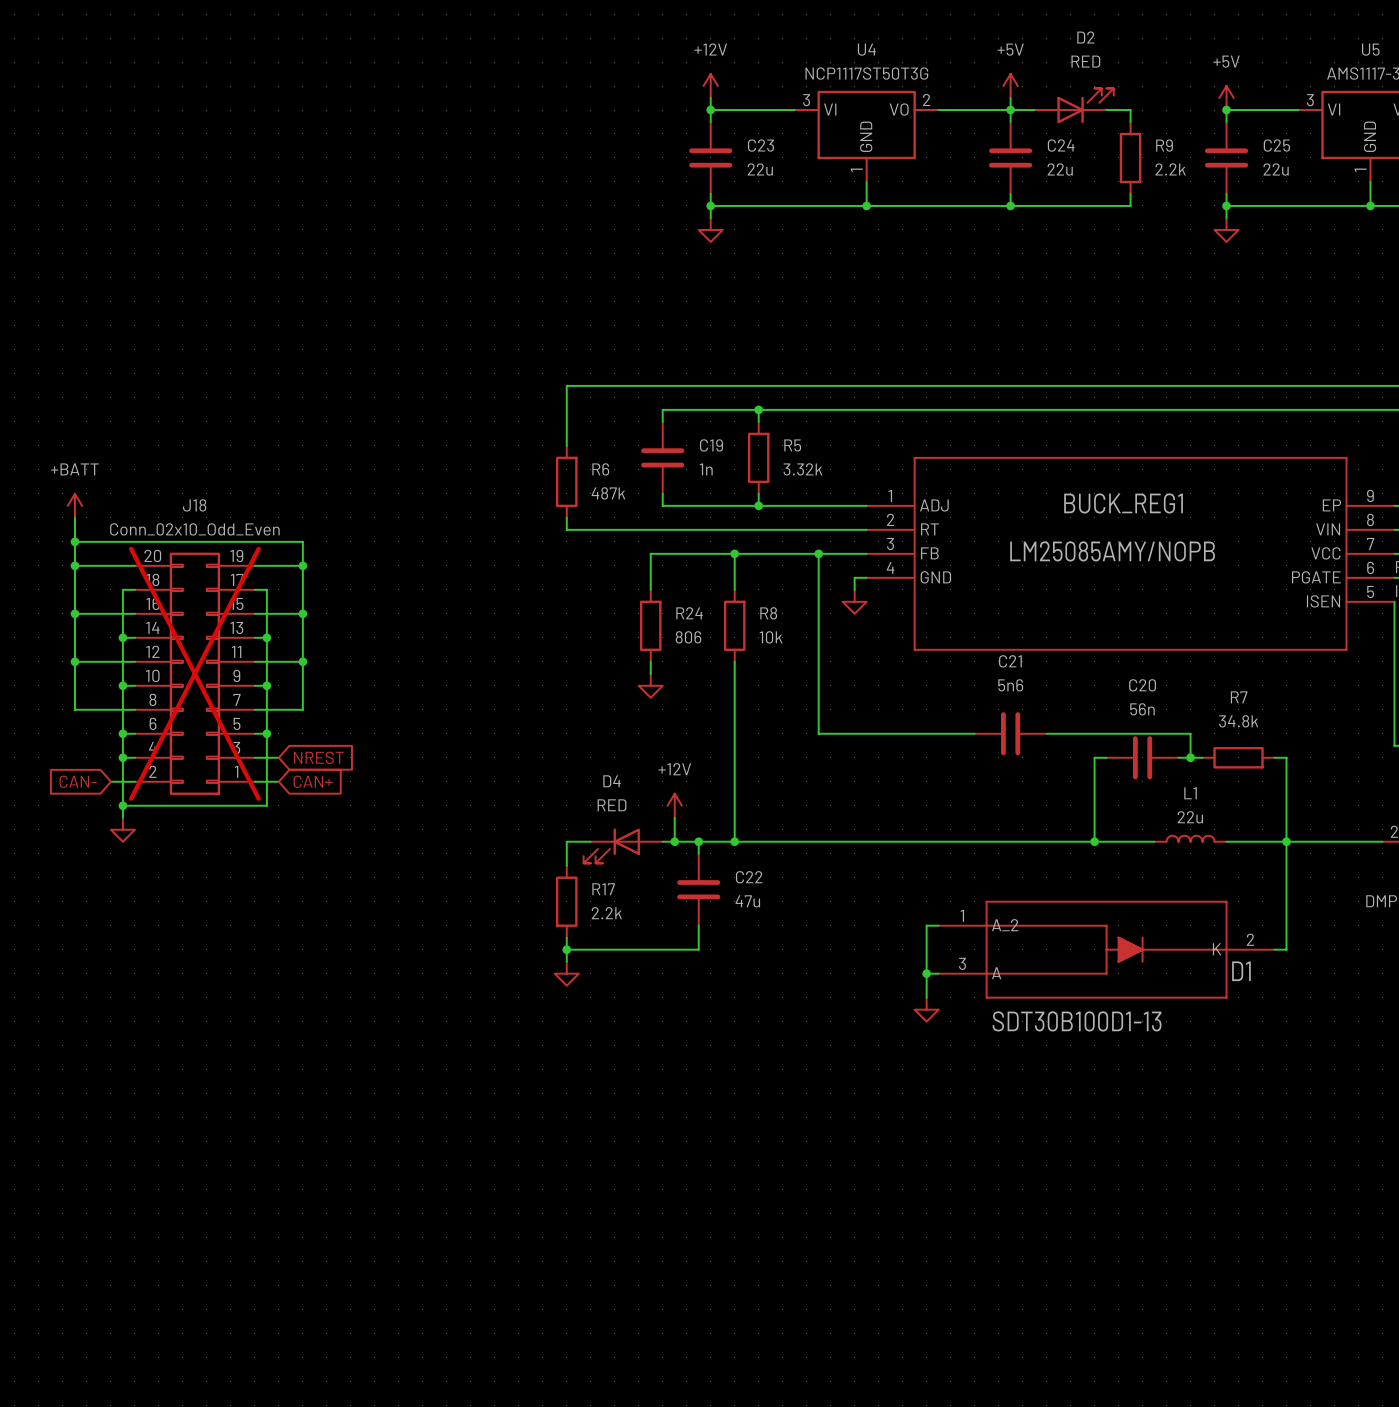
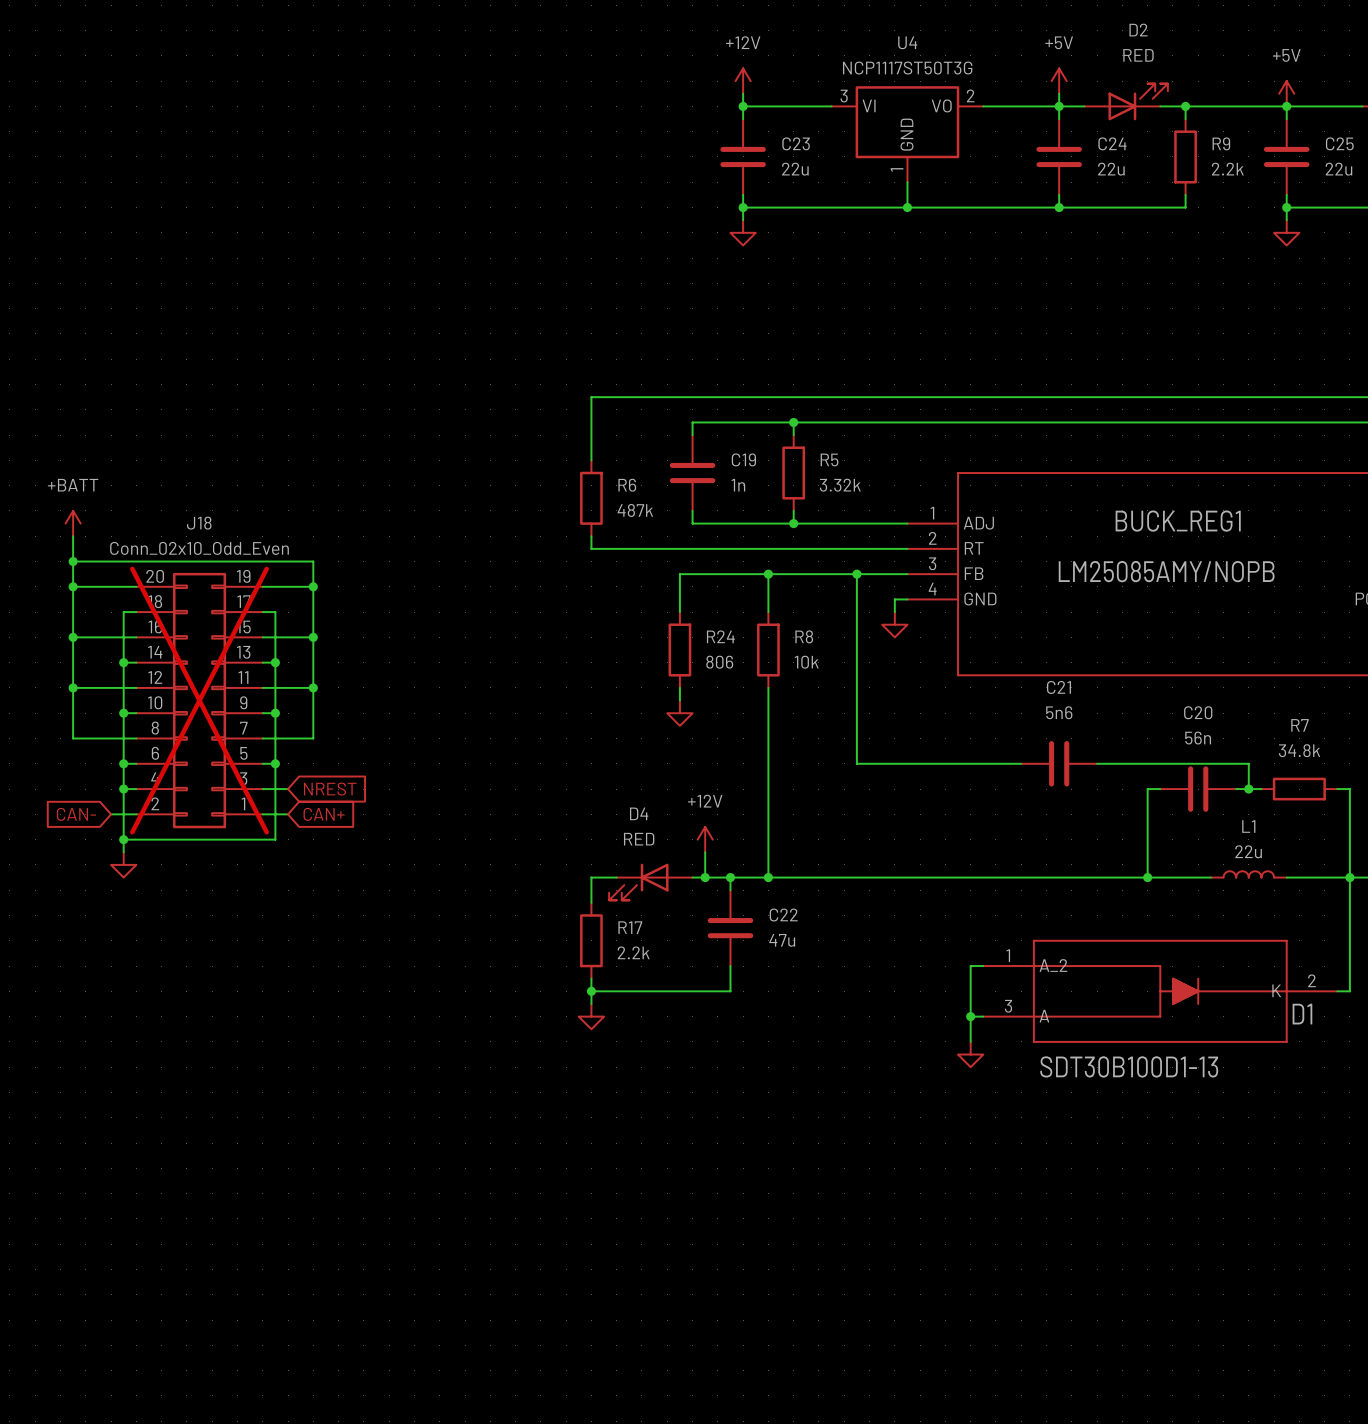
wire: none -> (1185, 106) (1286, 106)
junction: none -> (1185, 106)

